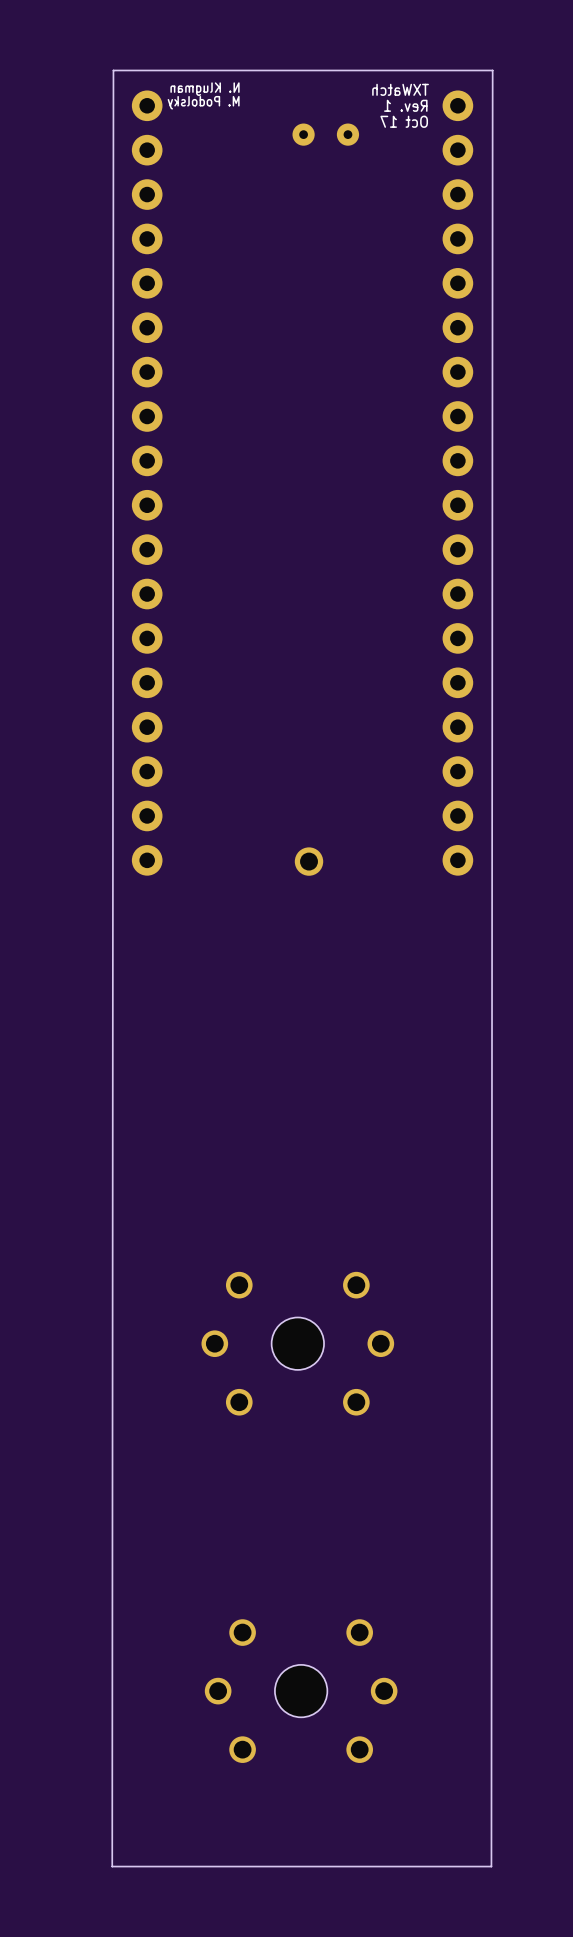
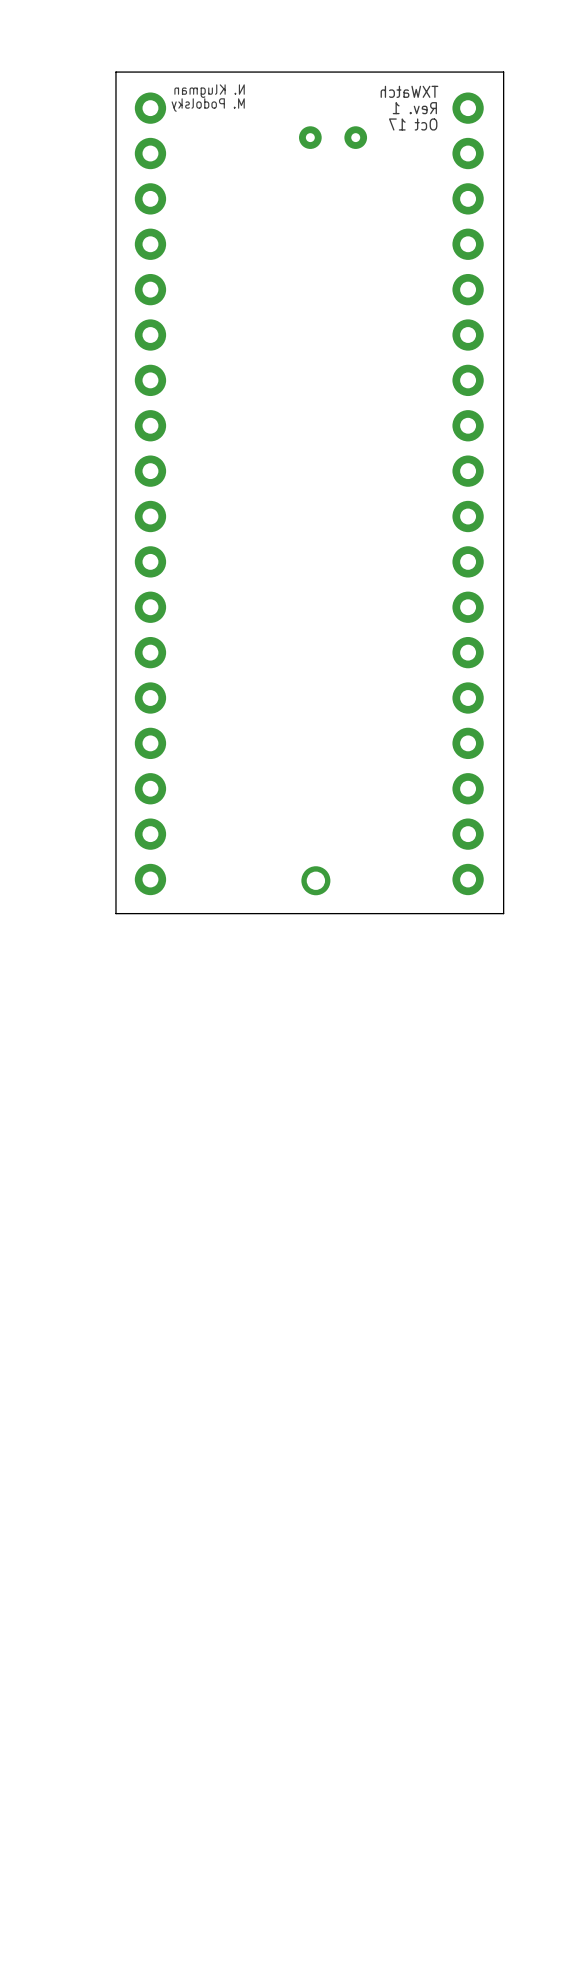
board edge: (492, 70) (491, 1866) (112, 1866) (113, 70) -> (503, 72) (503, 913) (115, 913) (115, 72)
part: (297, 1343) -> none
part: (301, 1691) -> none

